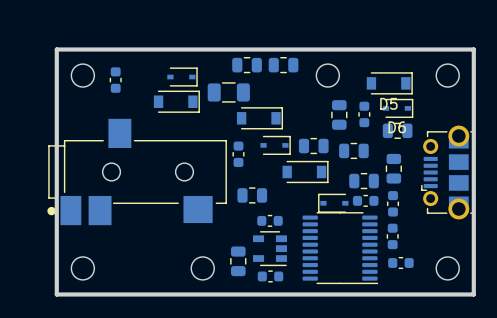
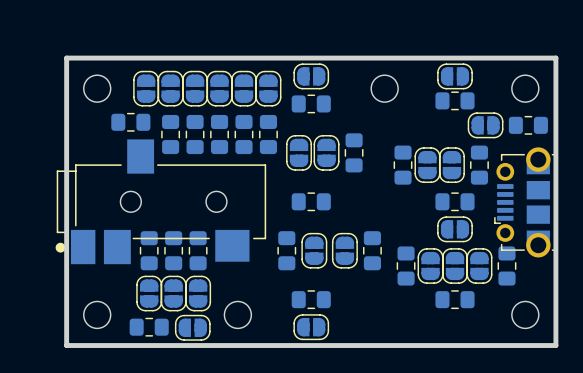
part: (247, 65) -> none
part: none -> (311, 76)
part: (283, 65) -> none
part: none -> (455, 76)
part footprint: [109, 67, 122, 93] -> [133, 70, 160, 107]
part footprint: [167, 67, 198, 87] -> [206, 70, 233, 107]
part: none -> (170, 88)
part: none -> (195, 88)
part: none -> (244, 88)
part: none -> (268, 88)
D5: (389, 83) -> none
part: none -> (455, 100)
part: none -> (311, 103)
part: (228, 92) -> none
part: (176, 101) -> none
part: none -> (130, 122)
part: none -> (485, 125)
part: none -> (528, 125)
D6: (398, 108) -> none
part: none -> (170, 134)
part: none -> (195, 134)
part: none -> (219, 134)
part: none -> (244, 134)
part: none -> (268, 134)
part: (339, 114) -> none
part: (364, 114) -> none
part: (259, 118) -> none
part: none -> (299, 152)
part: none -> (326, 152)
part: none -> (354, 152)
part: (397, 130) -> none
part: none -> (403, 165)
part: none -> (427, 165)
part: none -> (451, 165)
part: none -> (479, 165)
part: (275, 145) -> none
part: (313, 146) -> none
part: (353, 150) -> none
part footprint: [385, 153, 402, 184] -> [435, 192, 475, 212]
part: (238, 154) -> none
part: none -> (311, 201)
part: (305, 171) -> none
part: (364, 181) -> none
part footprint: [387, 191, 399, 217] -> [437, 216, 473, 243]
part: (252, 195) -> none
part: (365, 200) -> none
part: (333, 203) -> none
part: none -> (149, 250)
part: none -> (173, 250)
part: none -> (198, 250)
part: none -> (286, 250)
part: none -> (344, 250)
part: none -> (372, 250)
part footprint: [257, 214, 283, 227] -> [301, 232, 328, 269]
part: none -> (406, 266)
part: none -> (430, 266)
part: none -> (455, 266)
part: none -> (479, 266)
part: none -> (506, 266)
part footprint: [252, 231, 287, 267] -> [291, 290, 331, 310]
part: (392, 236) -> none
part: (340, 248) -> none
part: none -> (149, 293)
part: none -> (173, 293)
part: none -> (198, 293)
part: none -> (455, 299)
part: (238, 261) -> none
part: (400, 263) -> none
part footprint: [257, 270, 284, 283] -> [293, 314, 330, 341]
part: none -> (149, 327)
part: none -> (192, 327)

